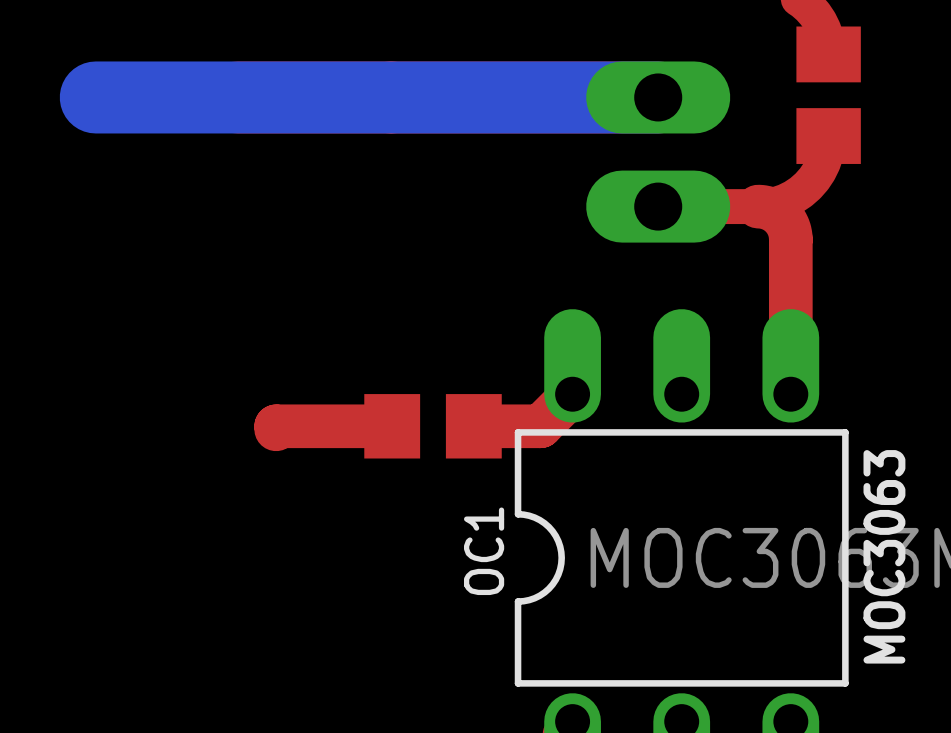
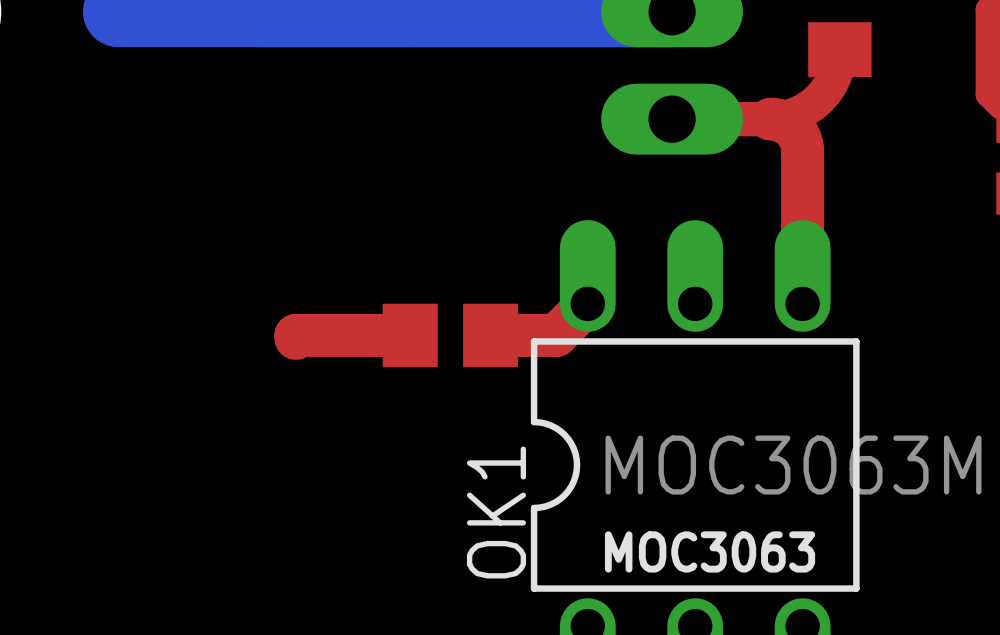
OC1 name: OC1 (484, 551) -> OK1 (496, 512)
text rotation: 0° (884, 556) -> 90° clockwise (710, 551)

